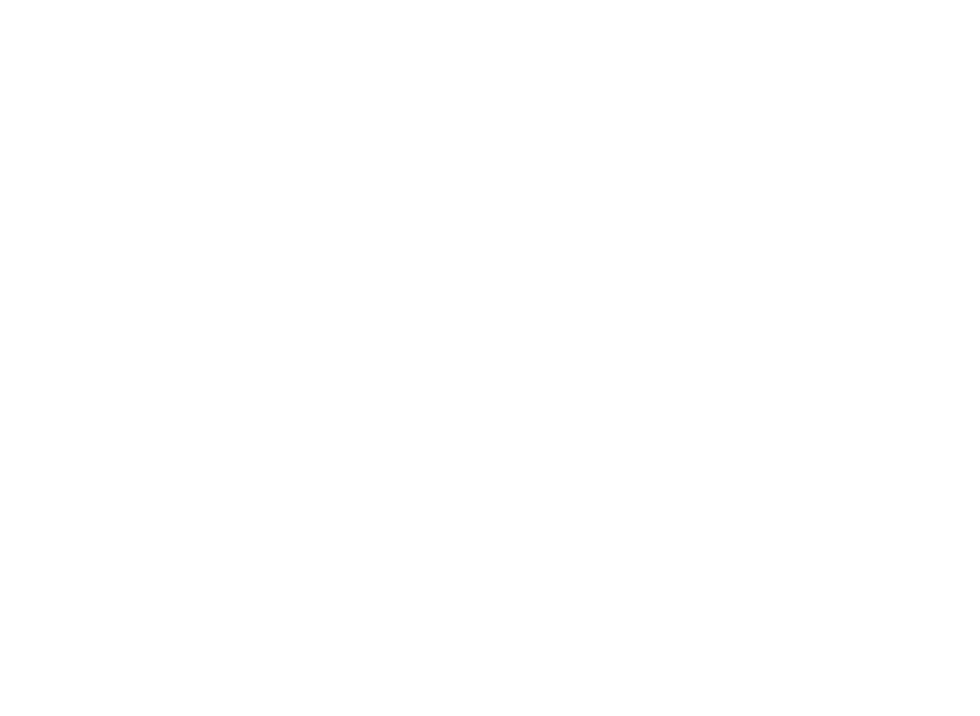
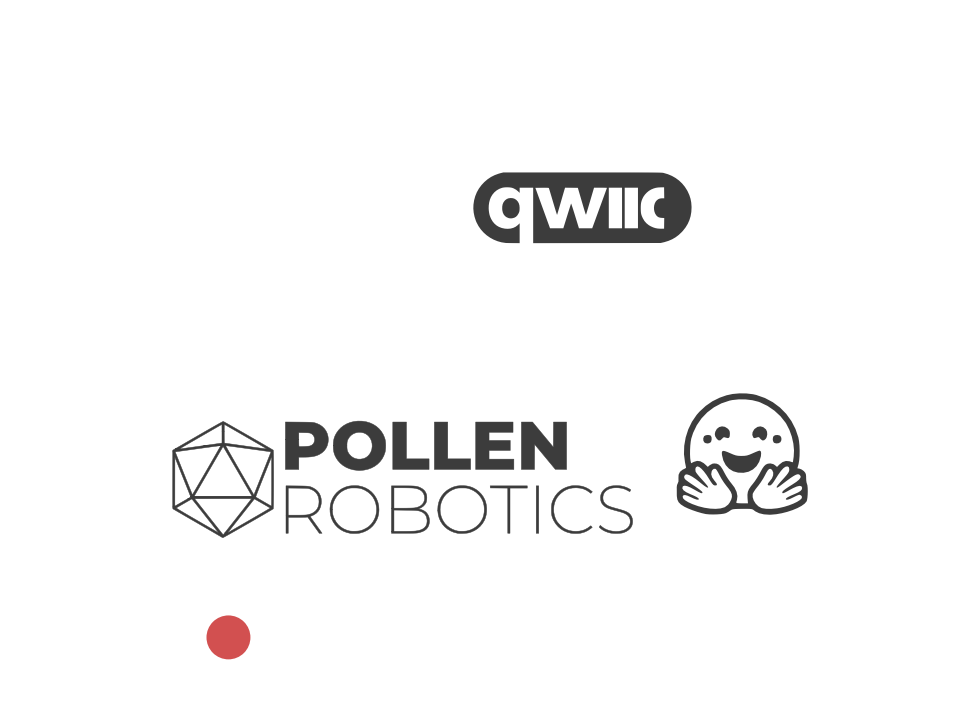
drawing: none -> [473, 172, 692, 244]
drawing: none -> [172, 393, 808, 538]
part: none -> (228, 637)

